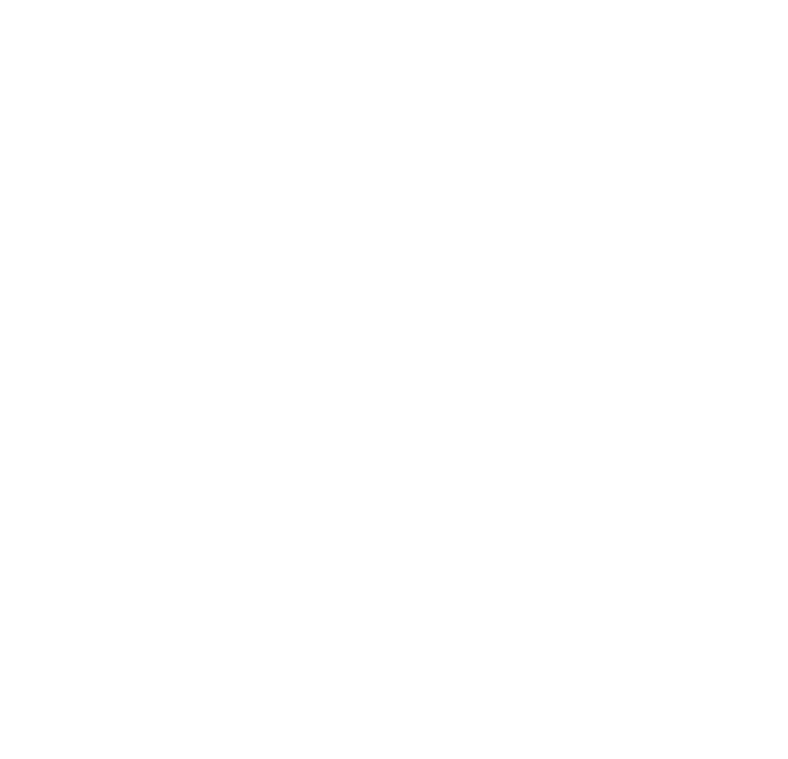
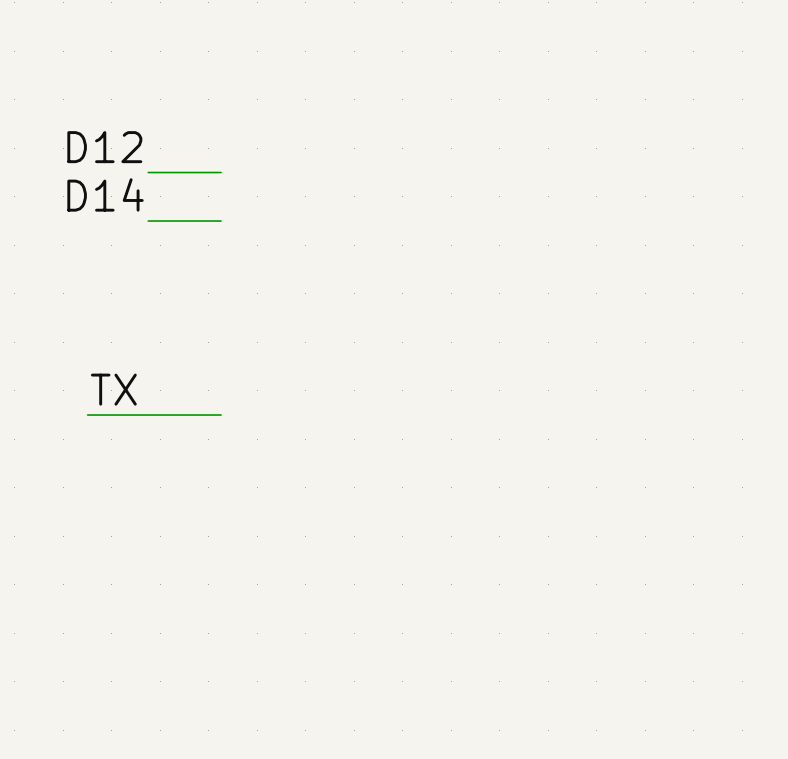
label: none -> D12 (104, 147)
wire: none -> (148, 172) (221, 172)
label: none -> D14 (105, 194)
wire: none -> (148, 221) (221, 221)
label: none -> TX (113, 389)
wire: none -> (87, 415) (221, 415)

